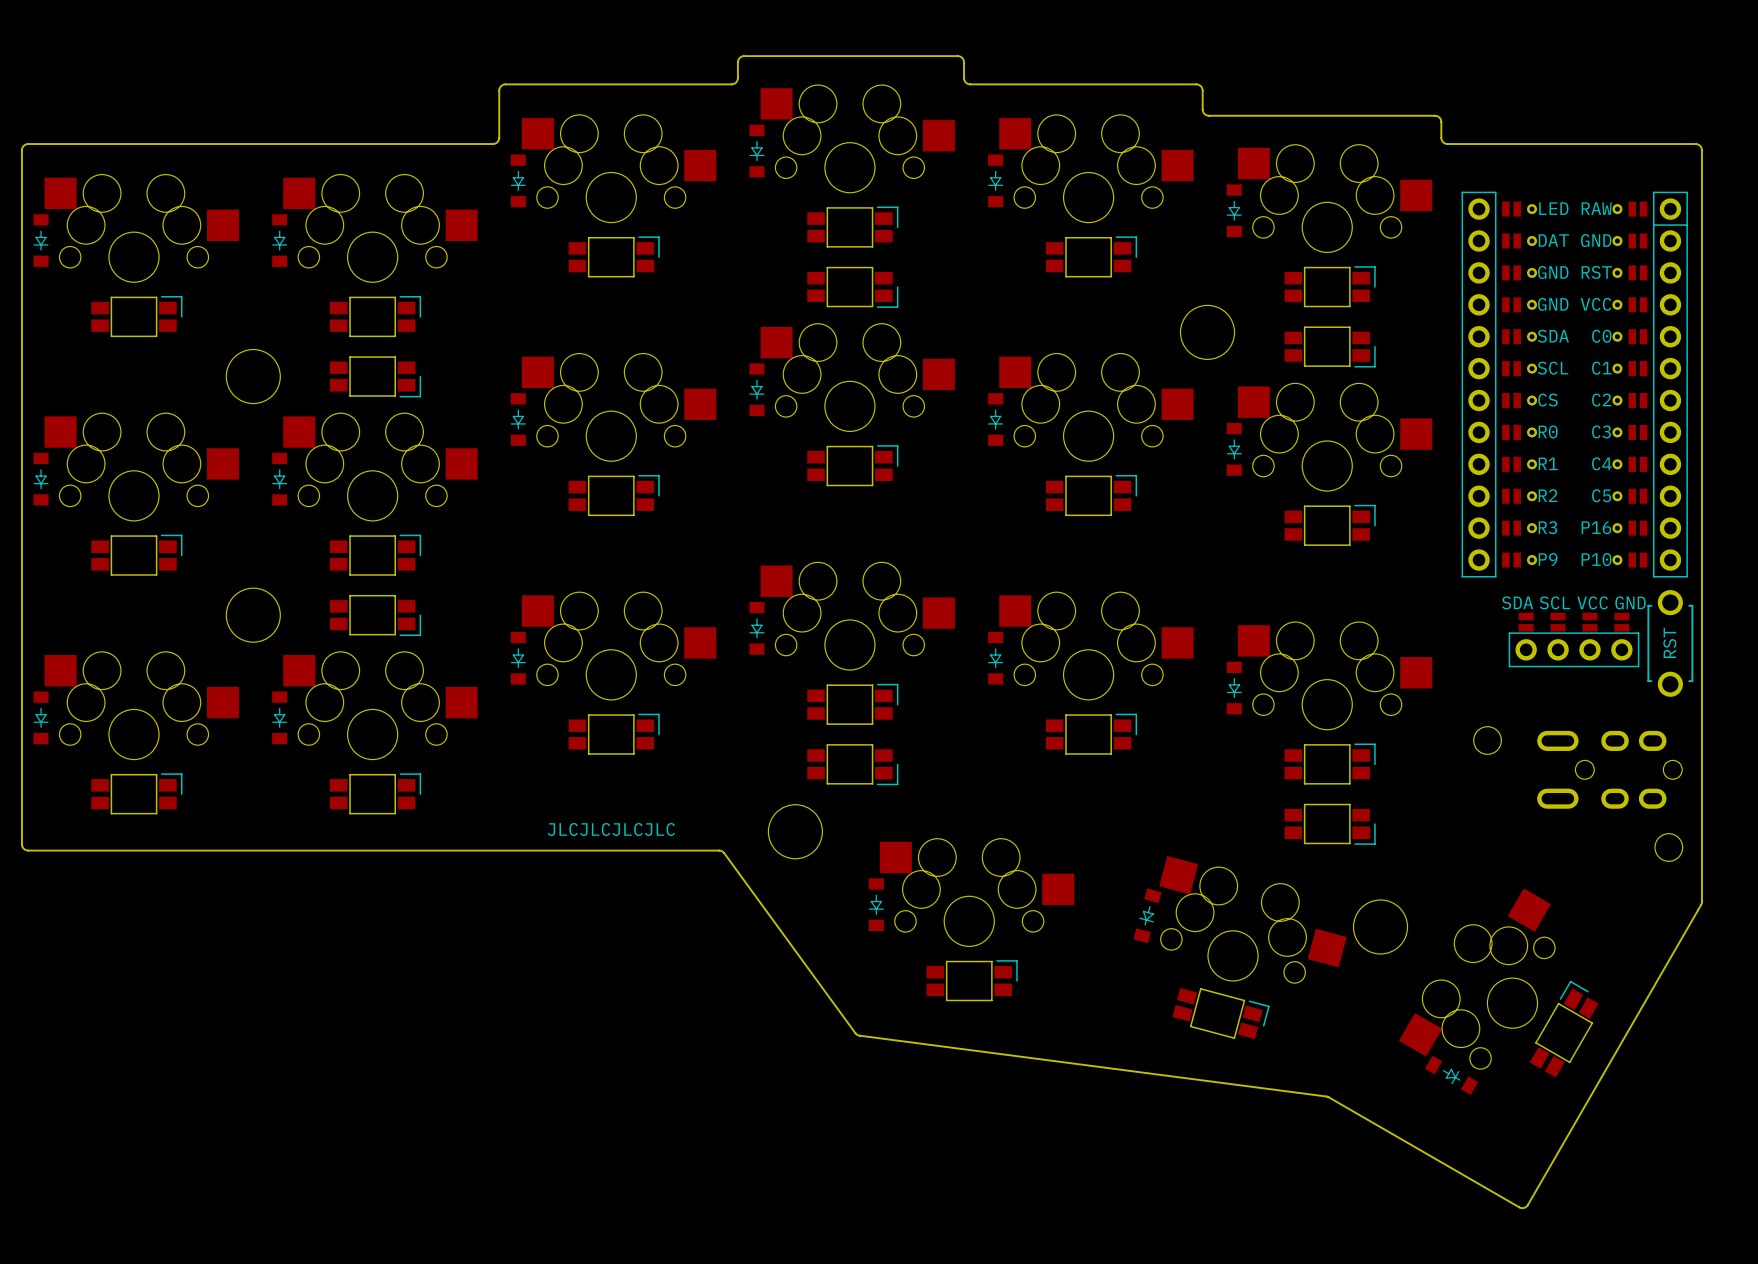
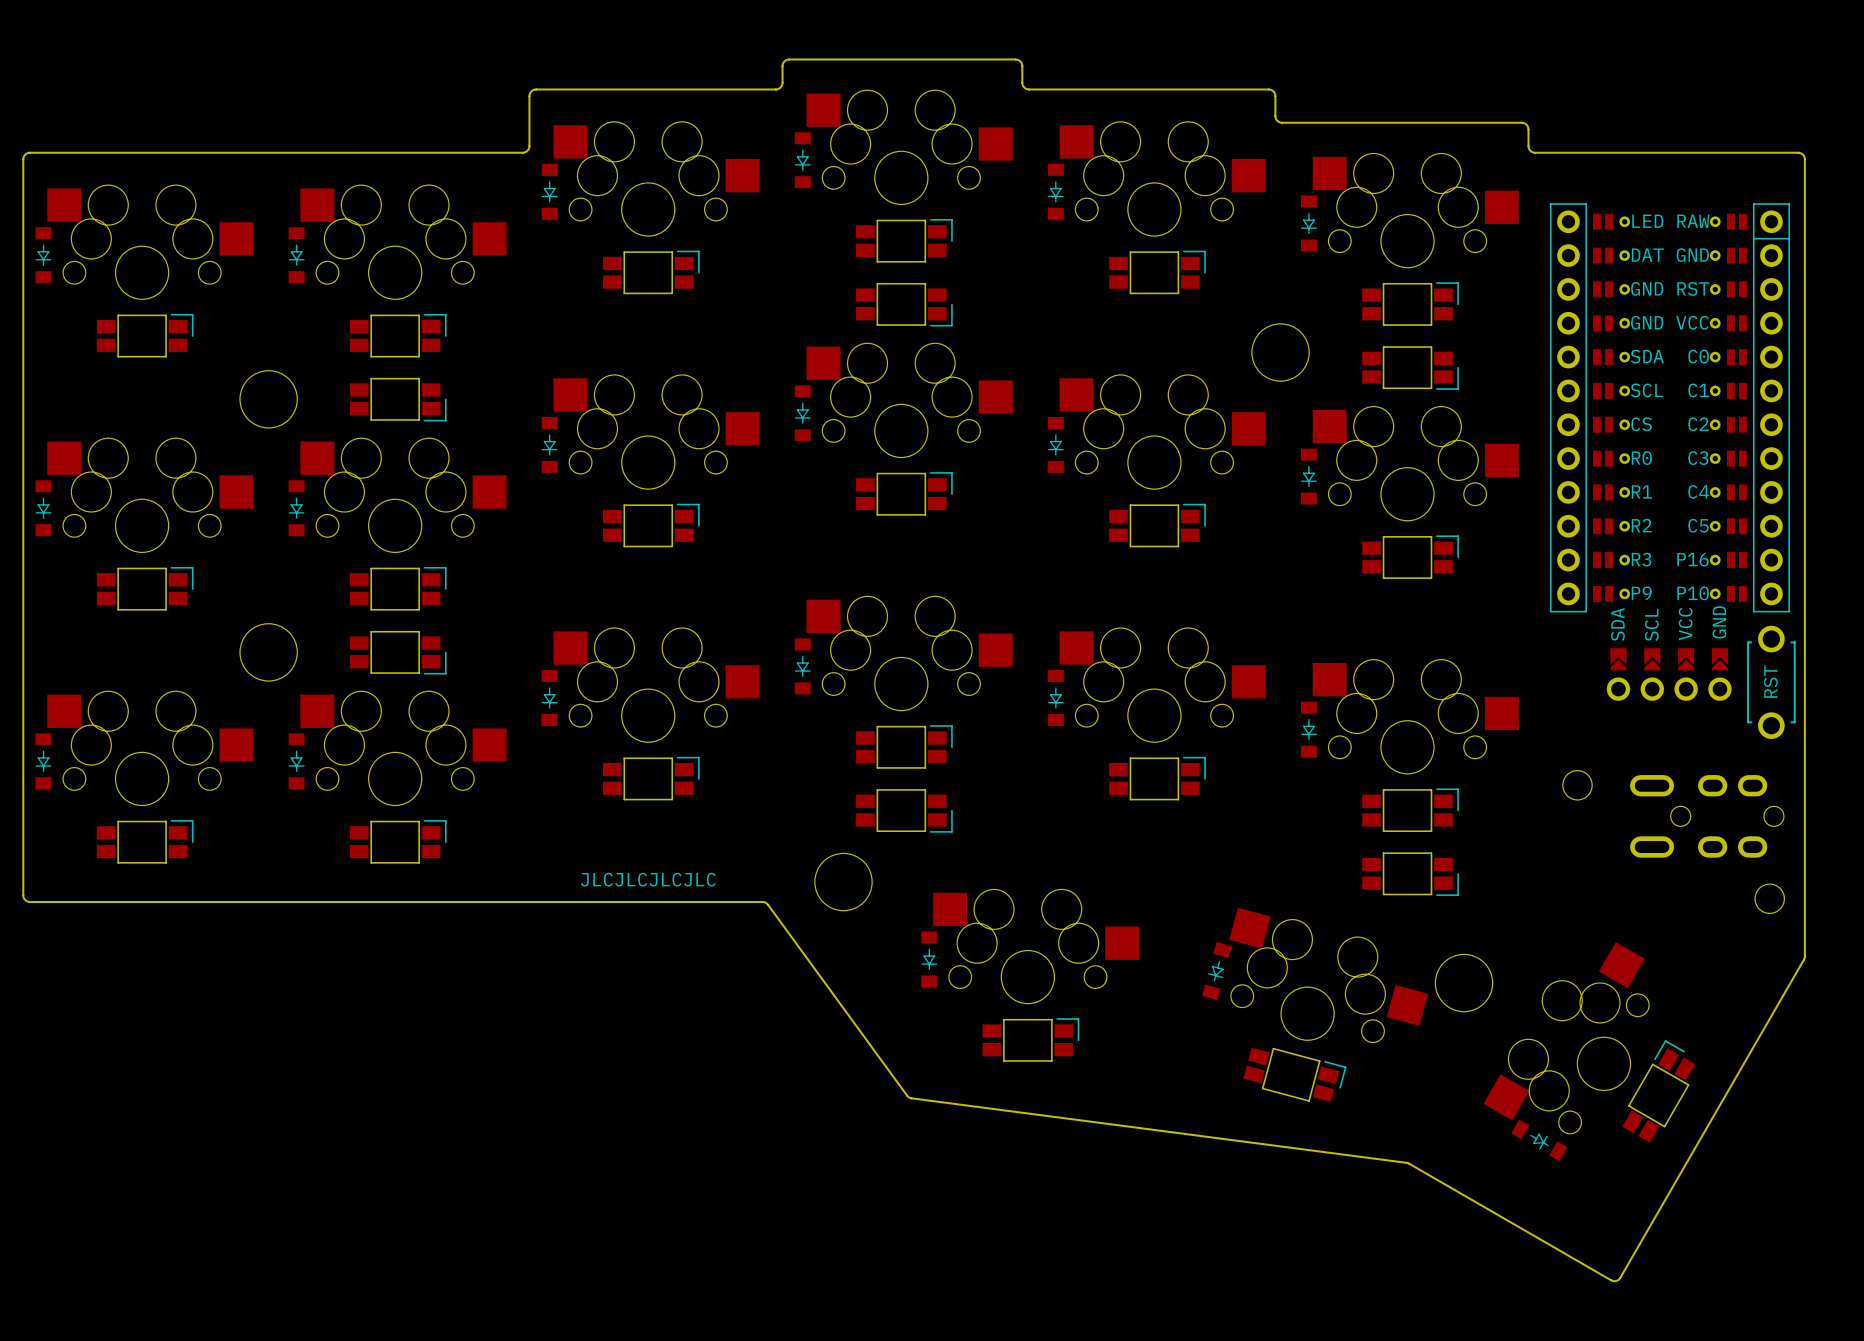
part footprint: [1508, 612, 1640, 668] -> [1606, 648, 1732, 701]

